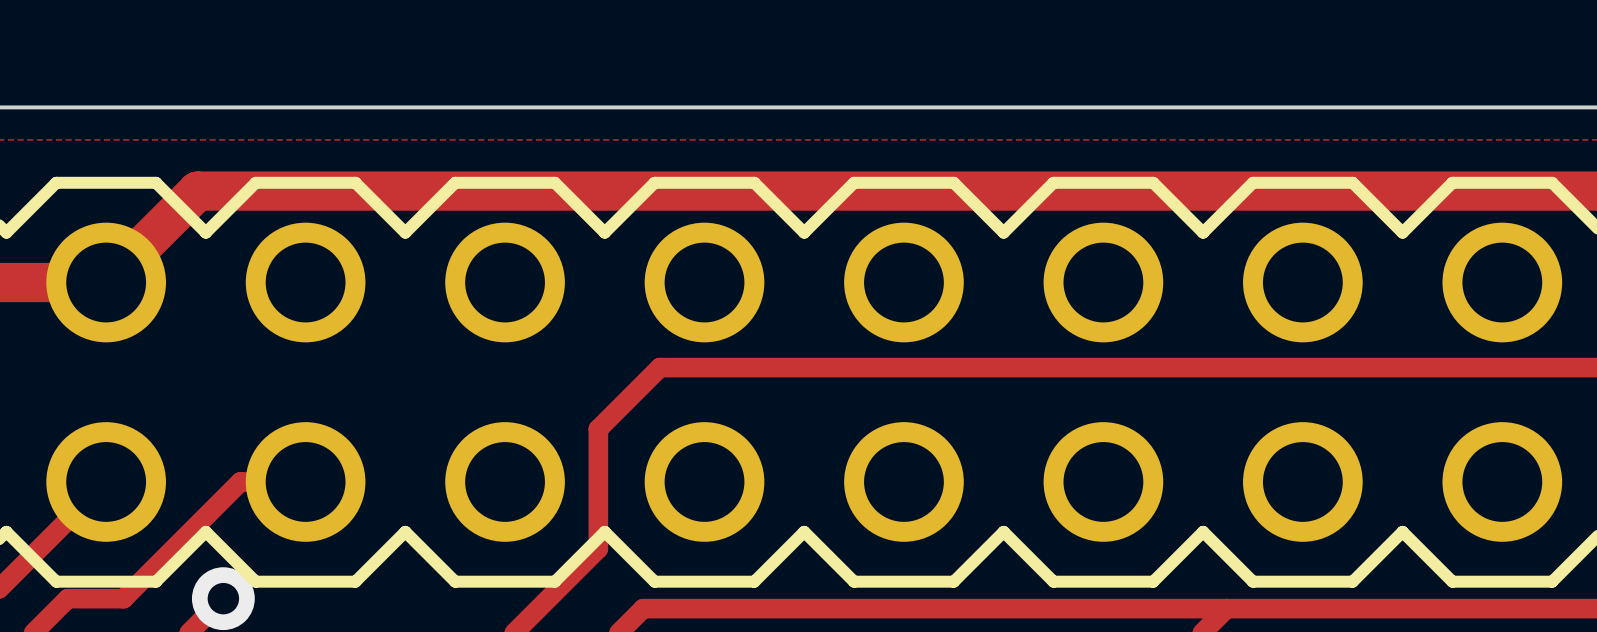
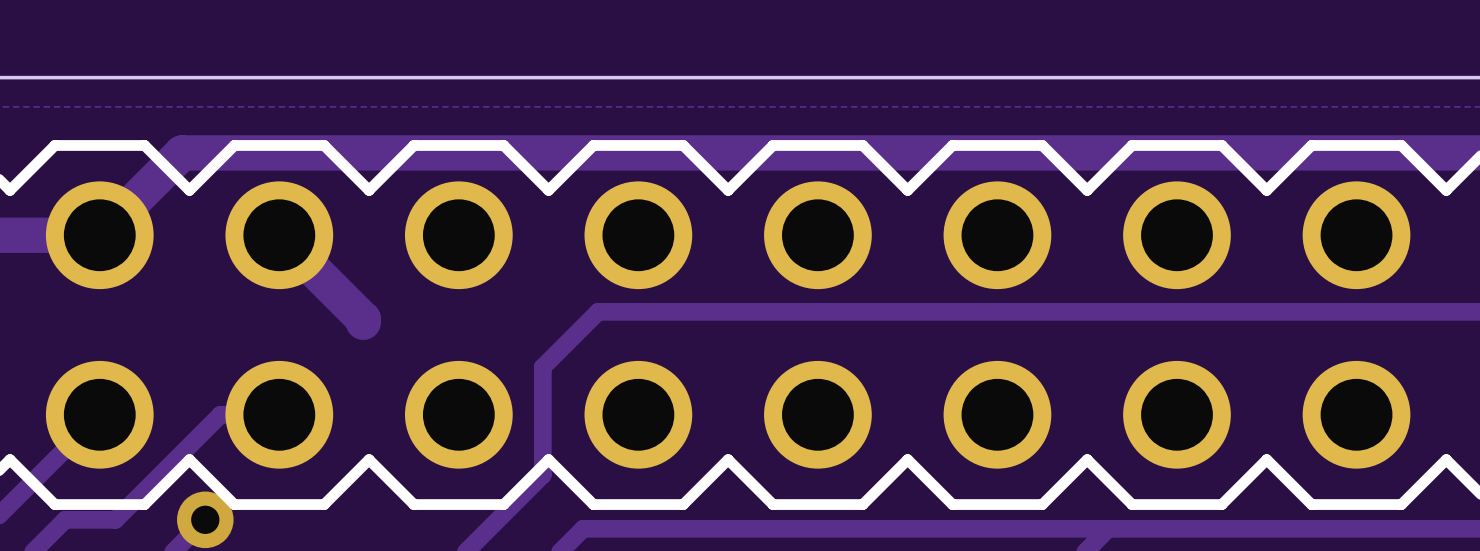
track: none -> (279, 235) (363, 319) (363, 322)

